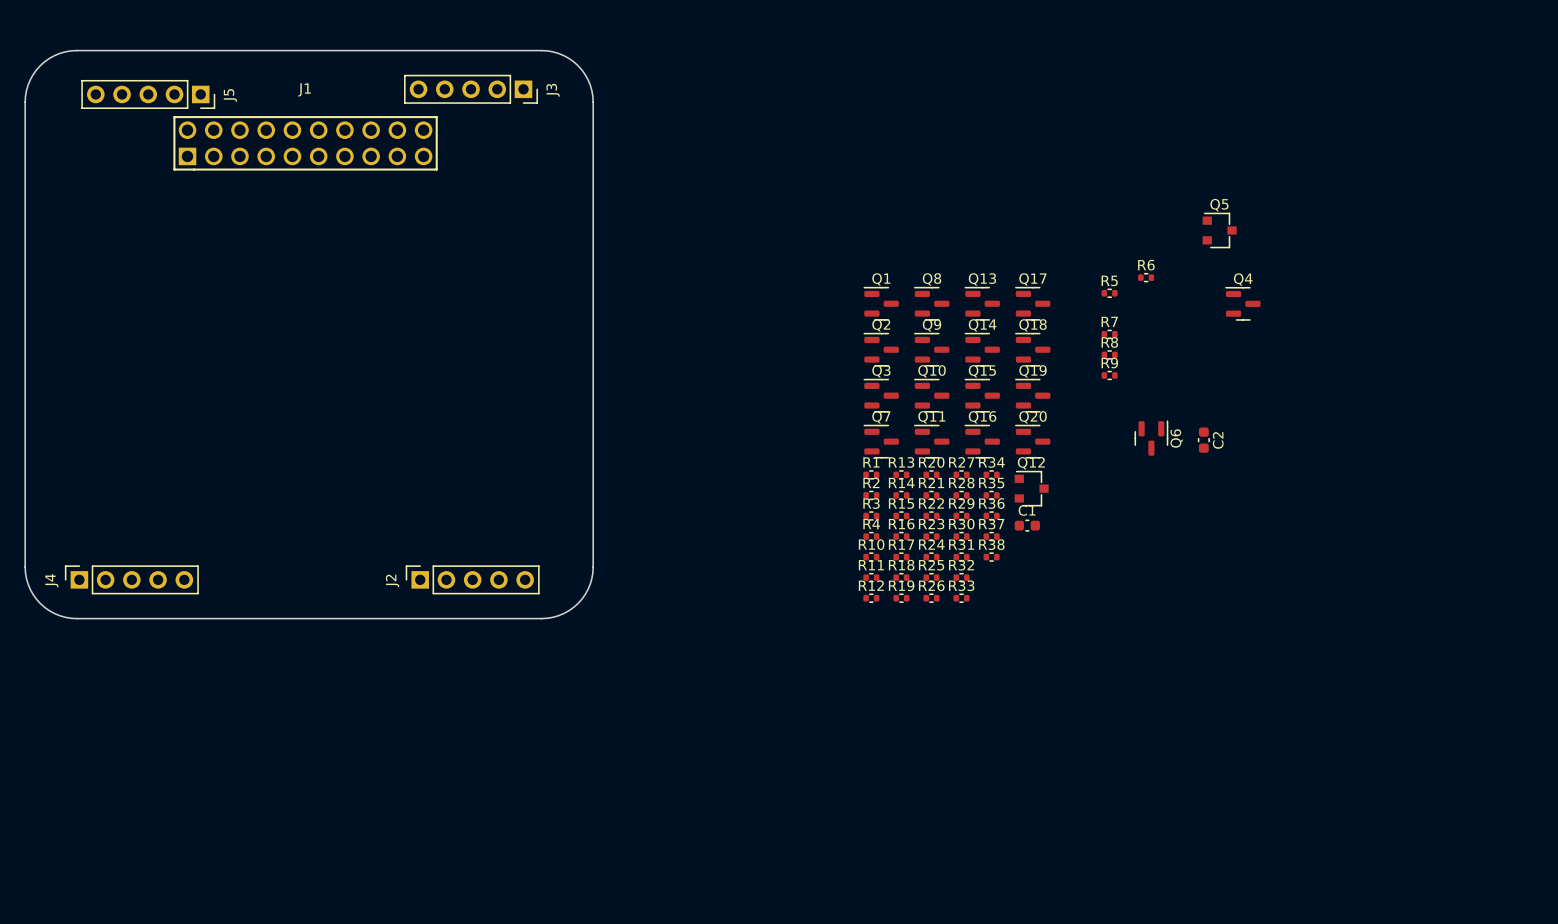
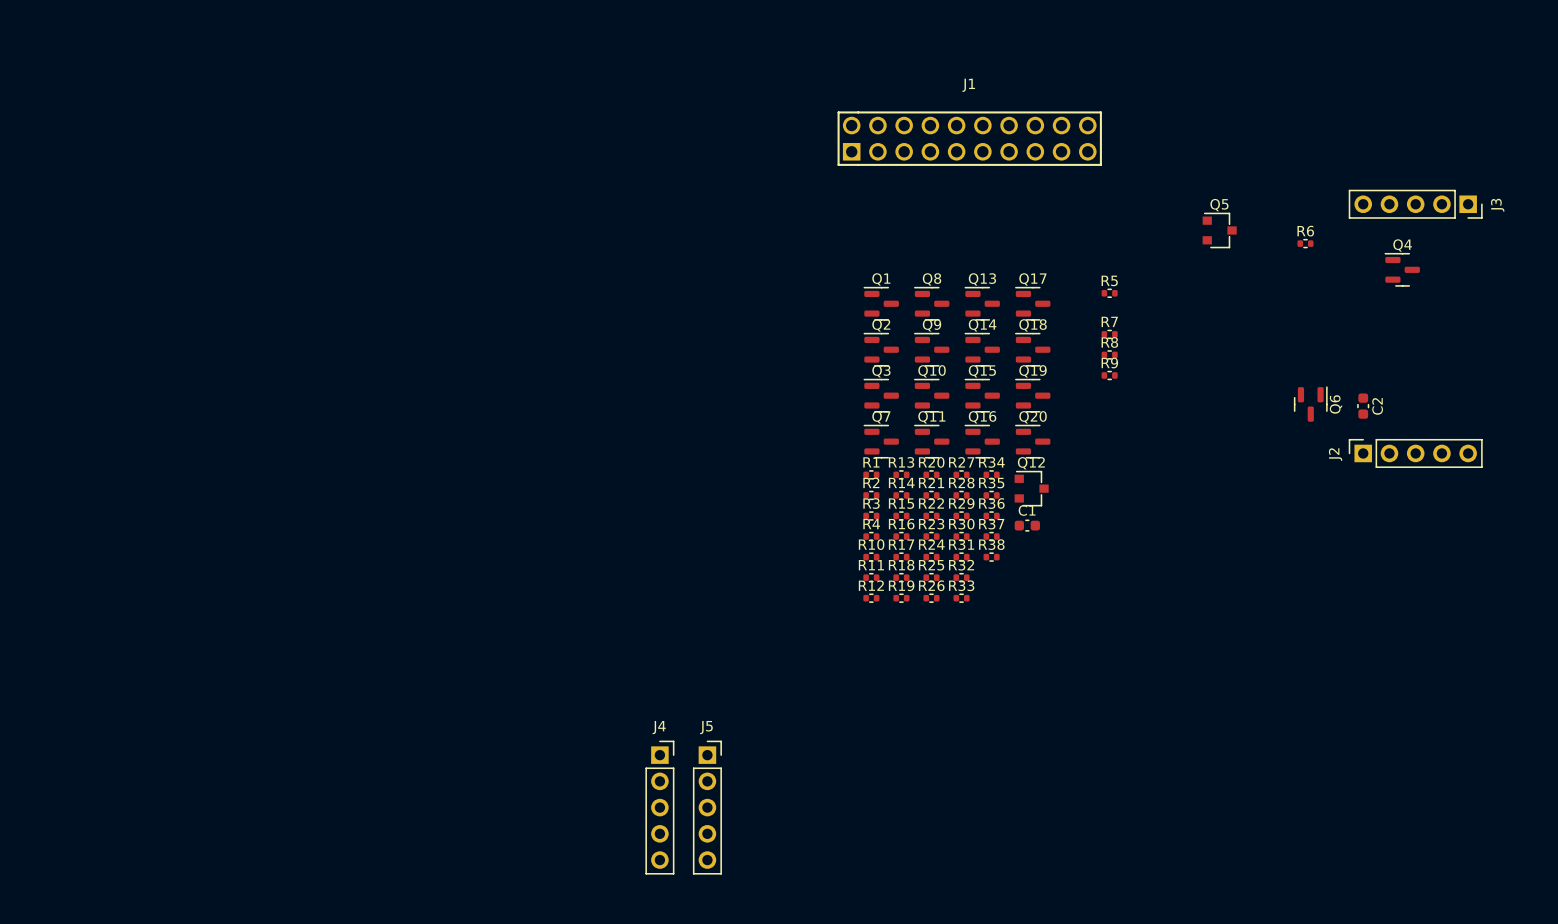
board edge: (76, 50) (541, 50) (558, 53) (578, 65) (590, 85) (593, 102) (593, 566) (590, 584) (578, 603) (558, 615) (541, 618) (76, 618) (59, 615) (40, 603) (28, 584) (25, 566) (25, 96) (33, 74) (44, 61) (59, 53) (76, 50) -> none
J3 position: (471, 89) -> (1415, 204)
J5 rotation: 0° (148, 94) -> 90° counterclockwise (707, 807)
J5 position: (148, 94) -> (707, 807)
J1 position: (305, 143) -> (969, 138)
R6 position: (1146, 277) -> (1305, 243)
Q4 position: (1242, 303) -> (1402, 269)
Q6 position: (1151, 438) -> (1310, 404)
C2 position: (1203, 440) -> (1363, 406)
J4 rotation: 0° (131, 579) -> 90° clockwise (659, 807)
J4 position: (131, 579) -> (659, 807)
J2 position: (472, 579) -> (1415, 453)

